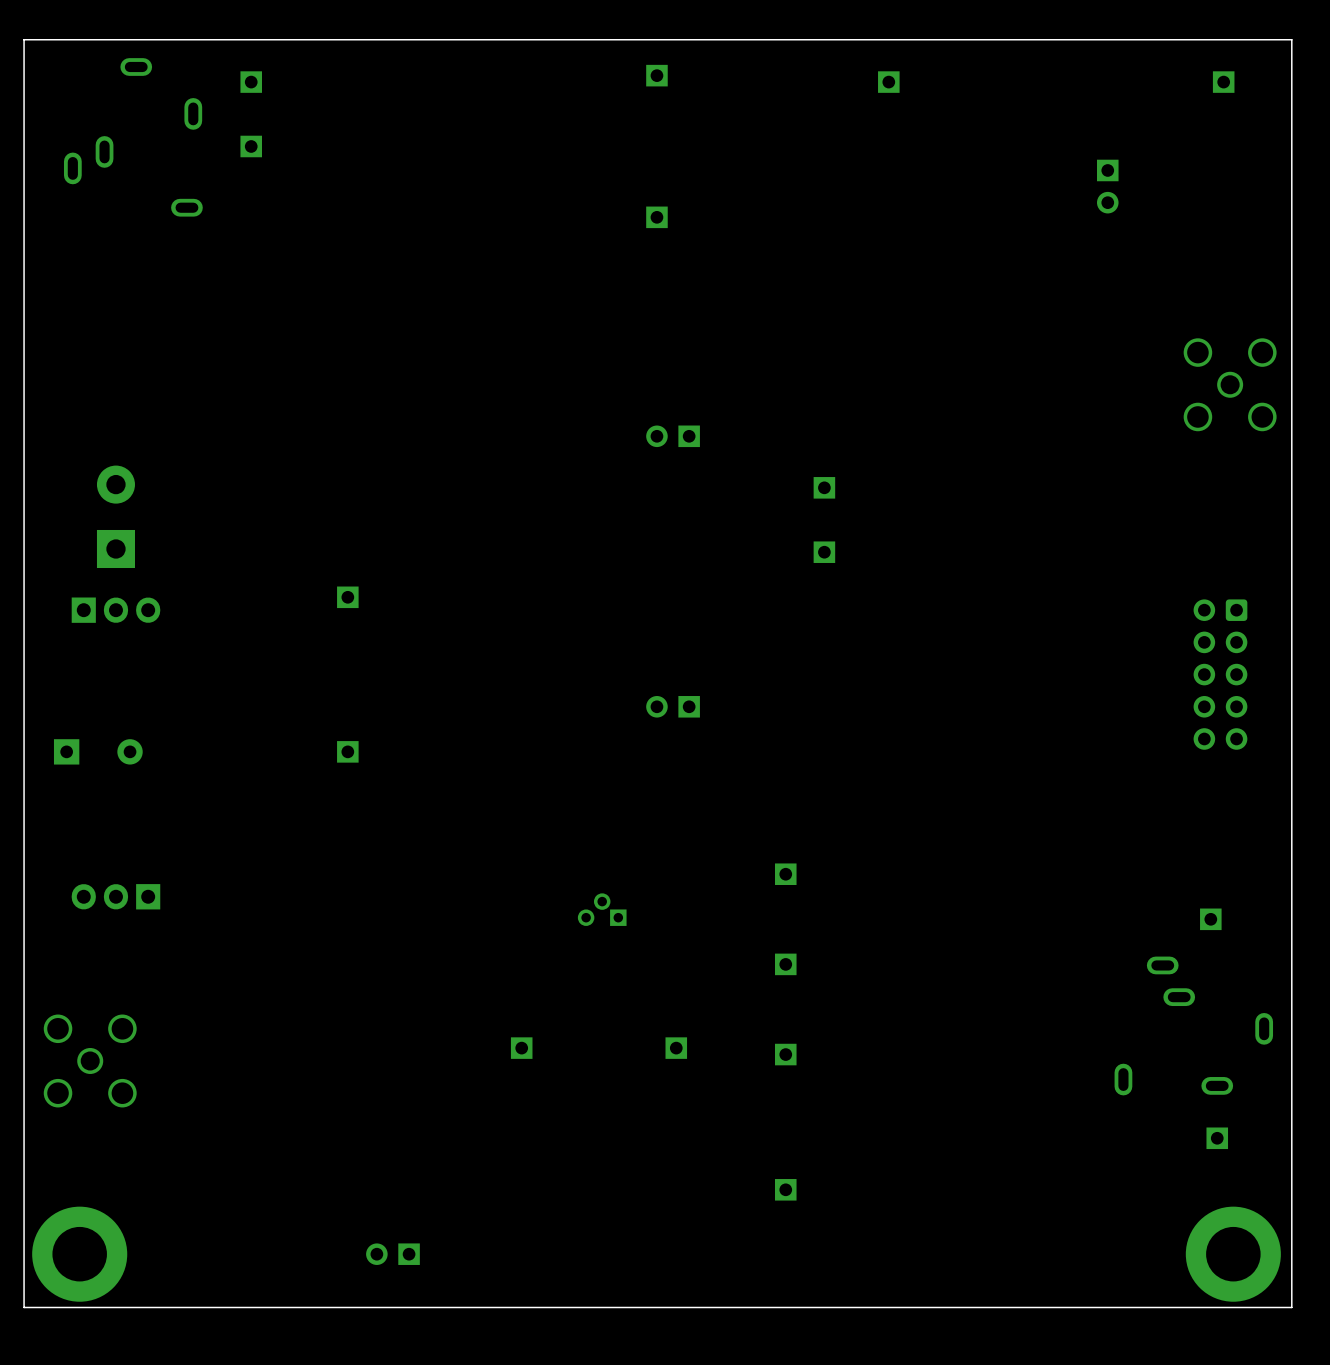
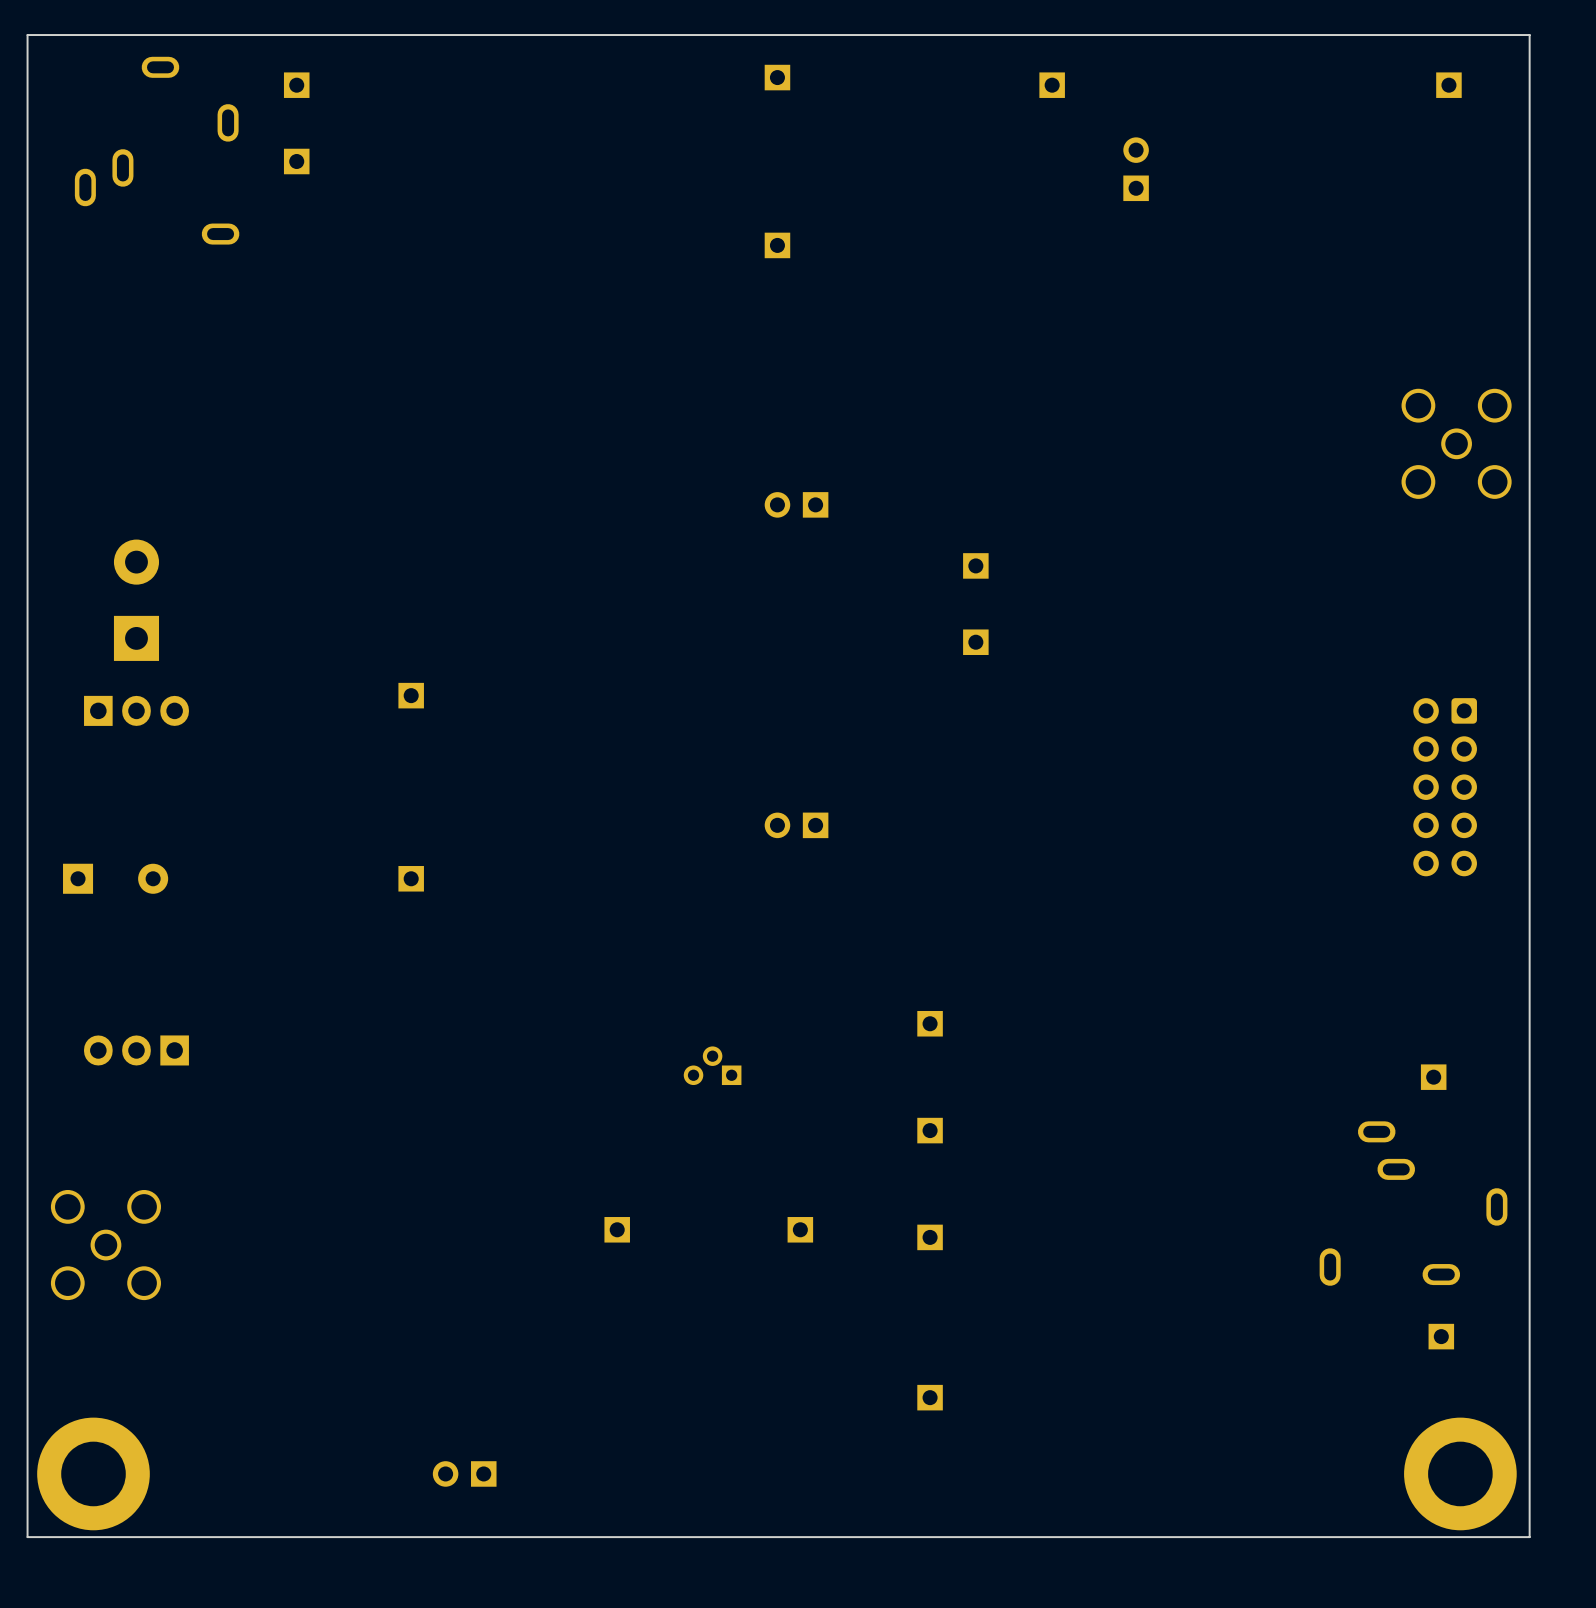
part rotation: 0° (1107, 186) -> 180° (1136, 169)
part position: (1107, 186) -> (1136, 169)

